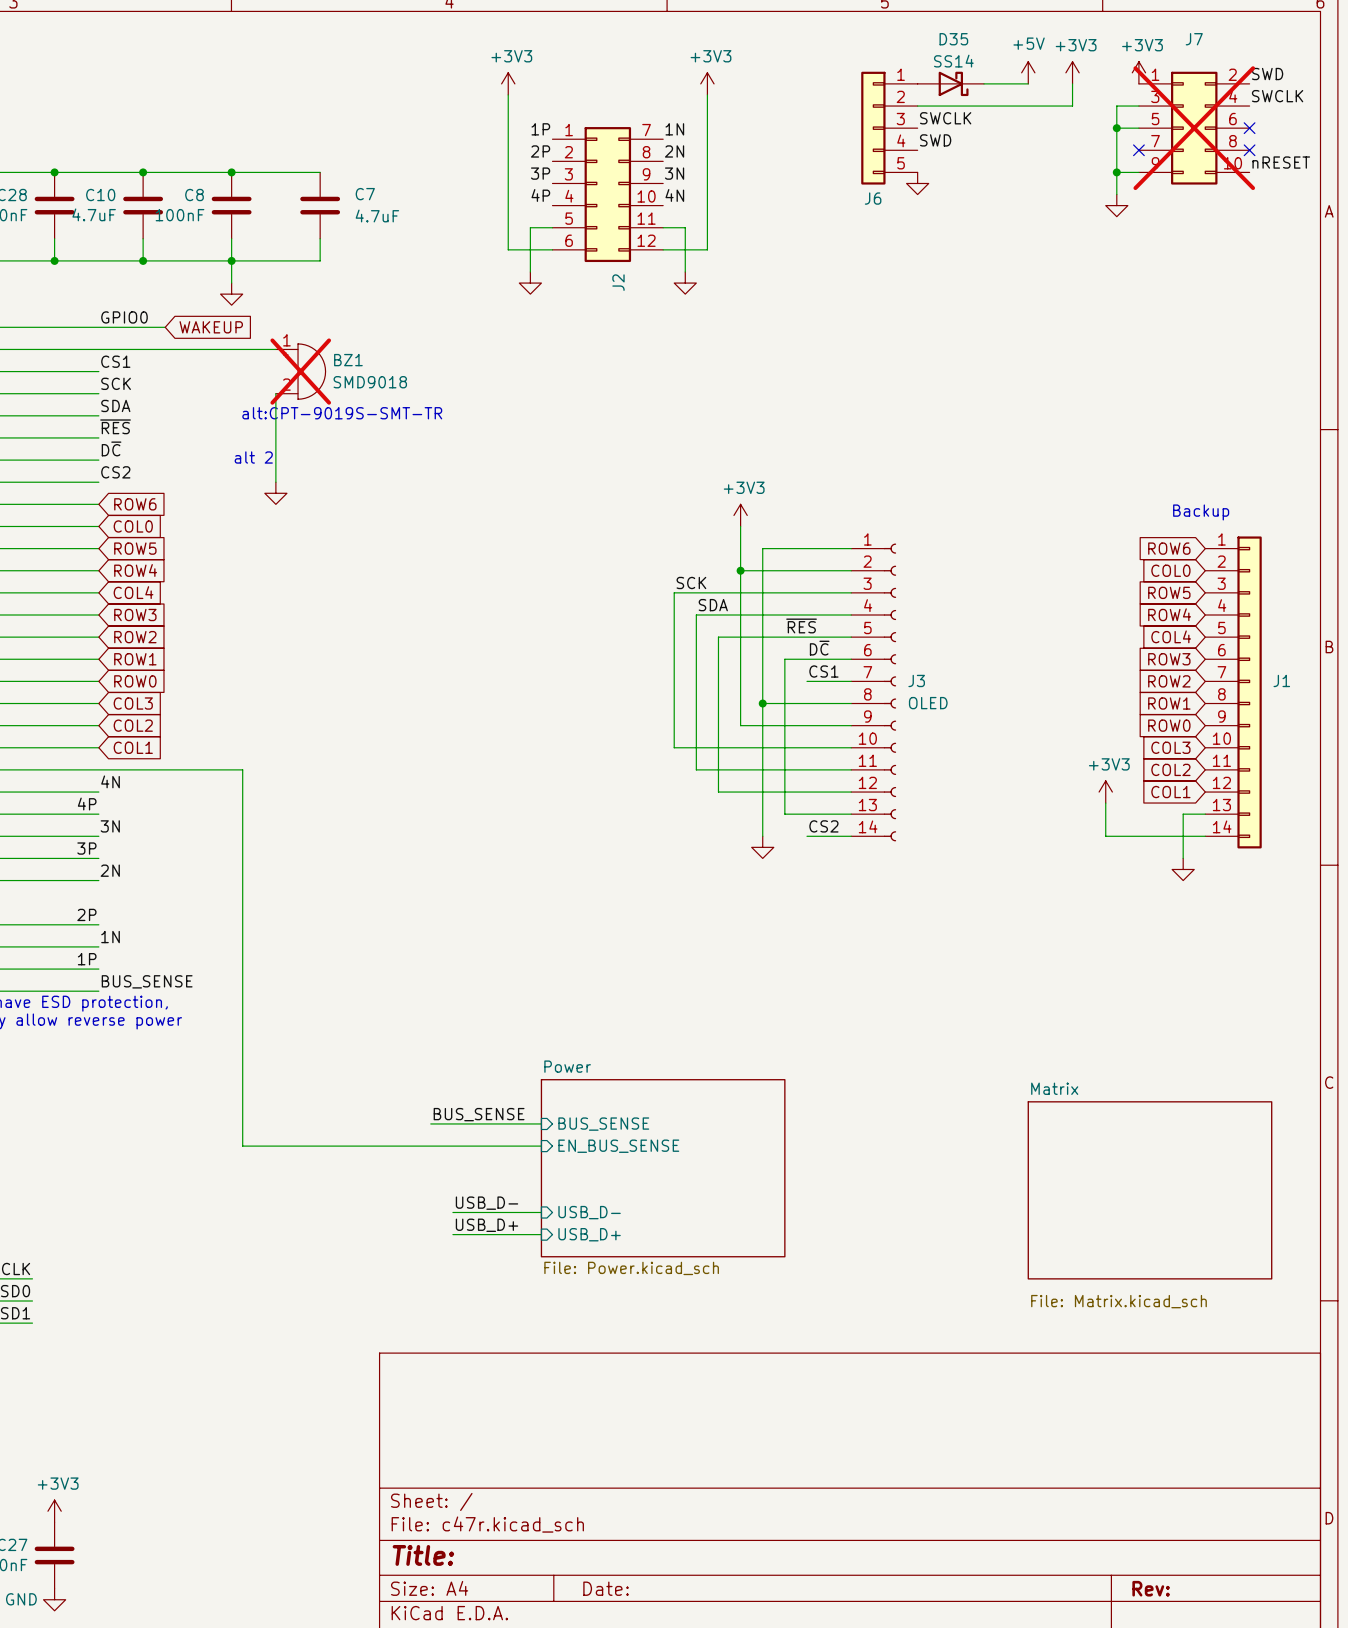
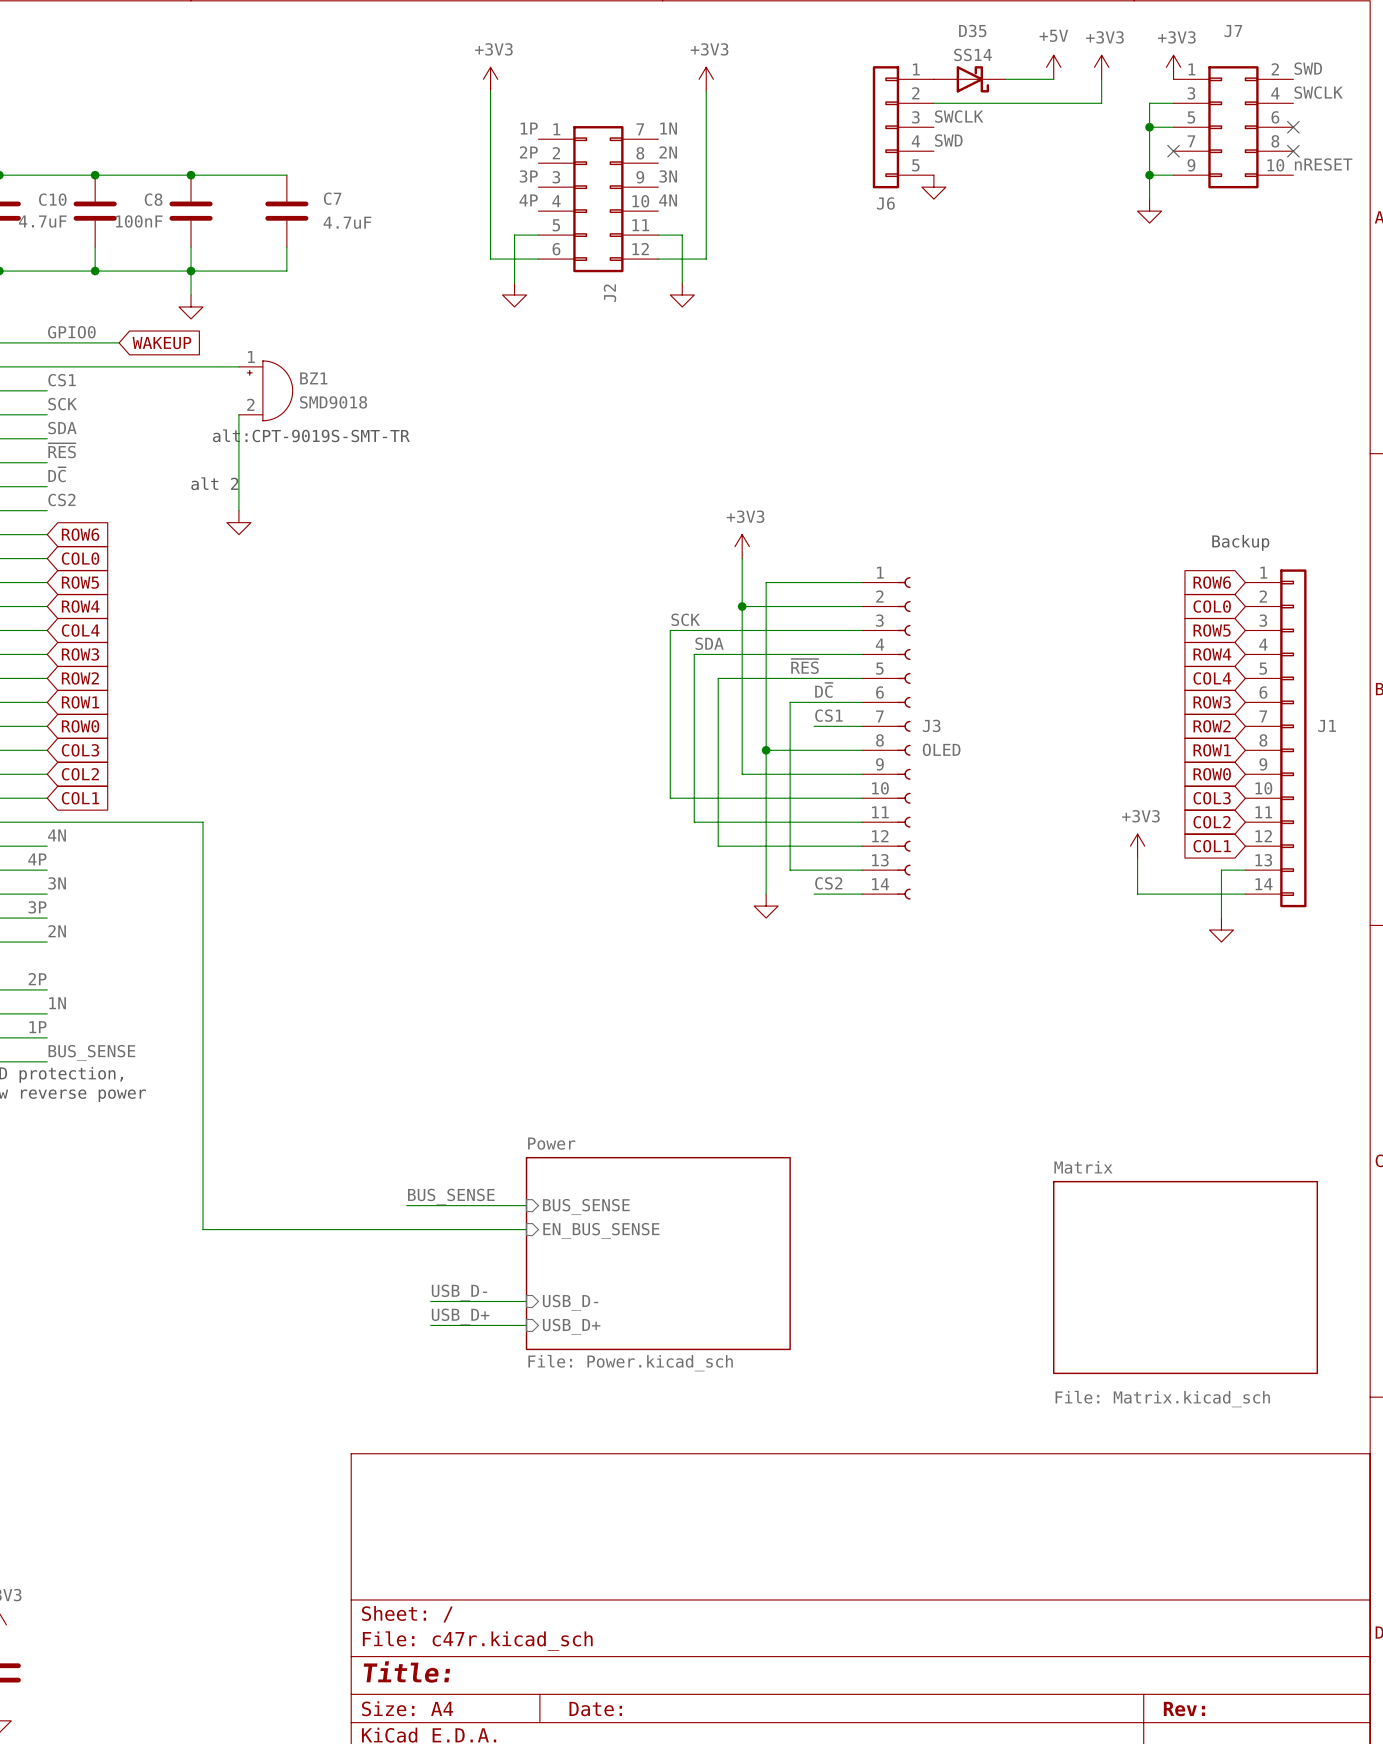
J7 do-not-place cross: (1194, 128) -> none
BZ1 do-not-place cross: (300, 371) -> none

